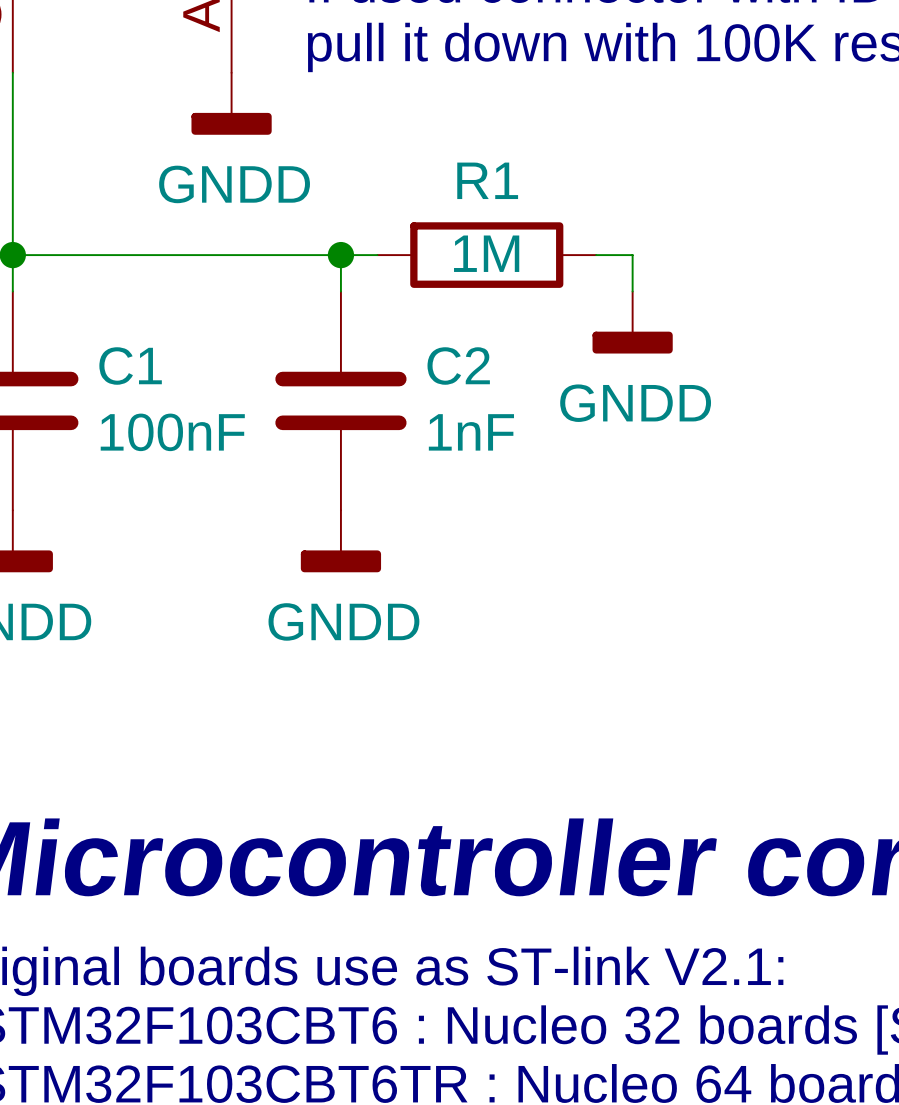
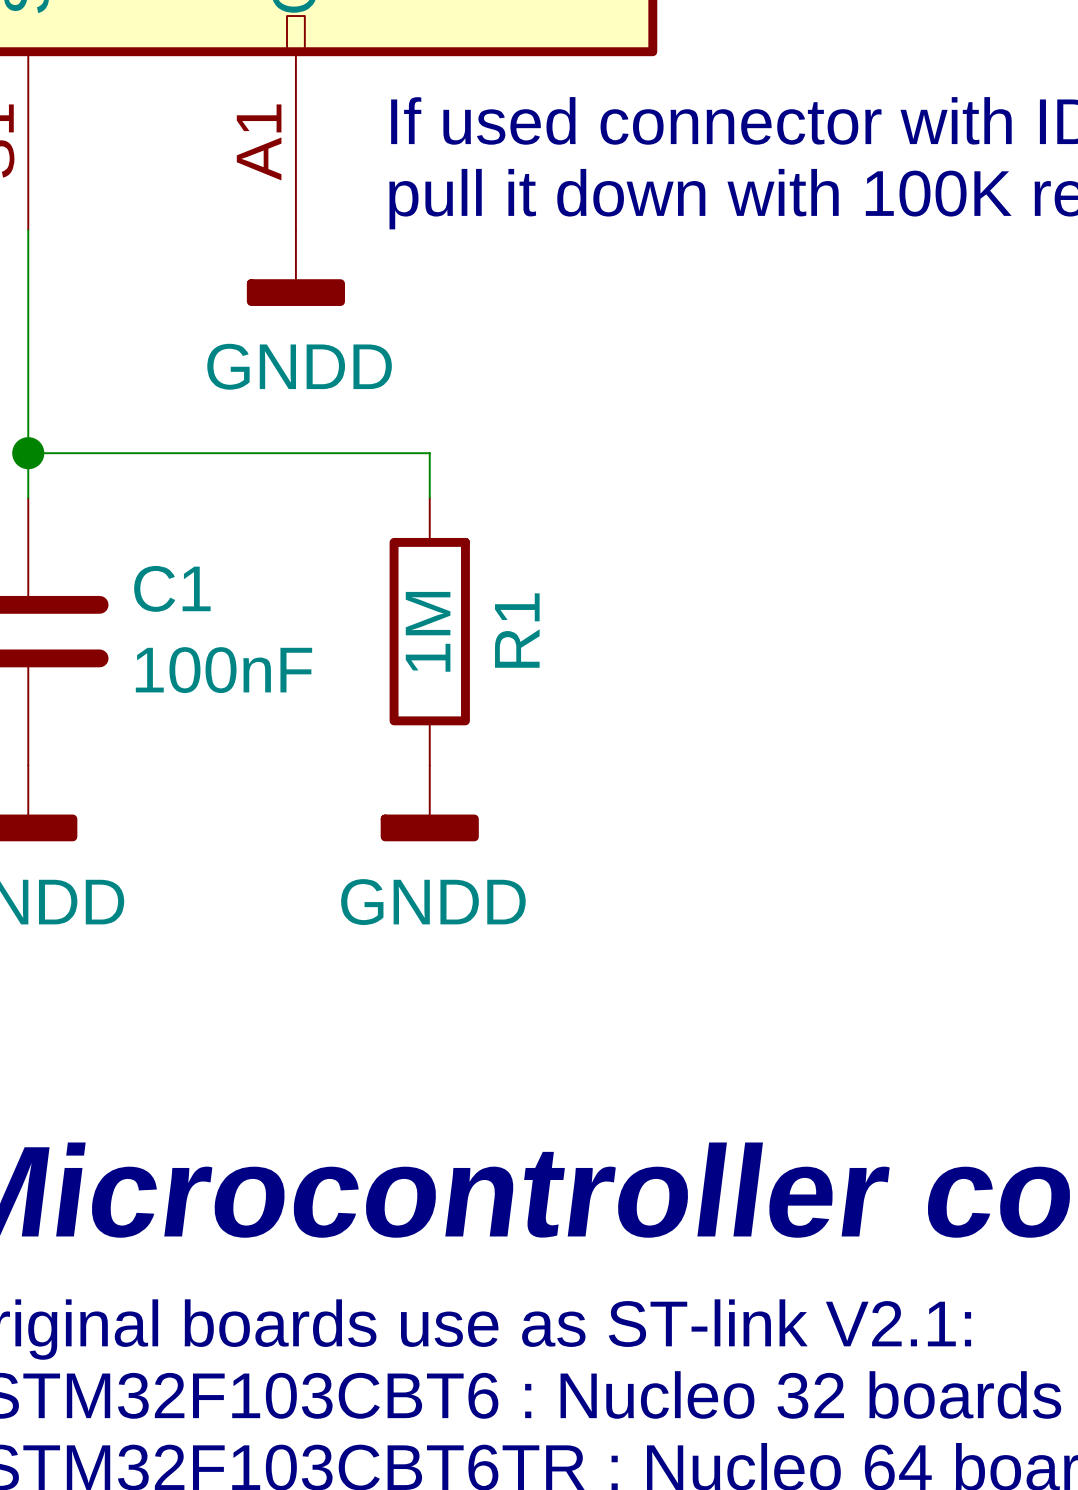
wire: (340, 255) (377, 255) -> none
junction: (340, 255) -> none
R1 rotation: 0° (486, 255) -> 90° clockwise (429, 631)
R1 position: (486, 255) -> (429, 631)
wire: (596, 255) (632, 255) (632, 291) -> none
power symbol: GNDD (632, 322) -> none
C2: 1nF (340, 400) -> none

